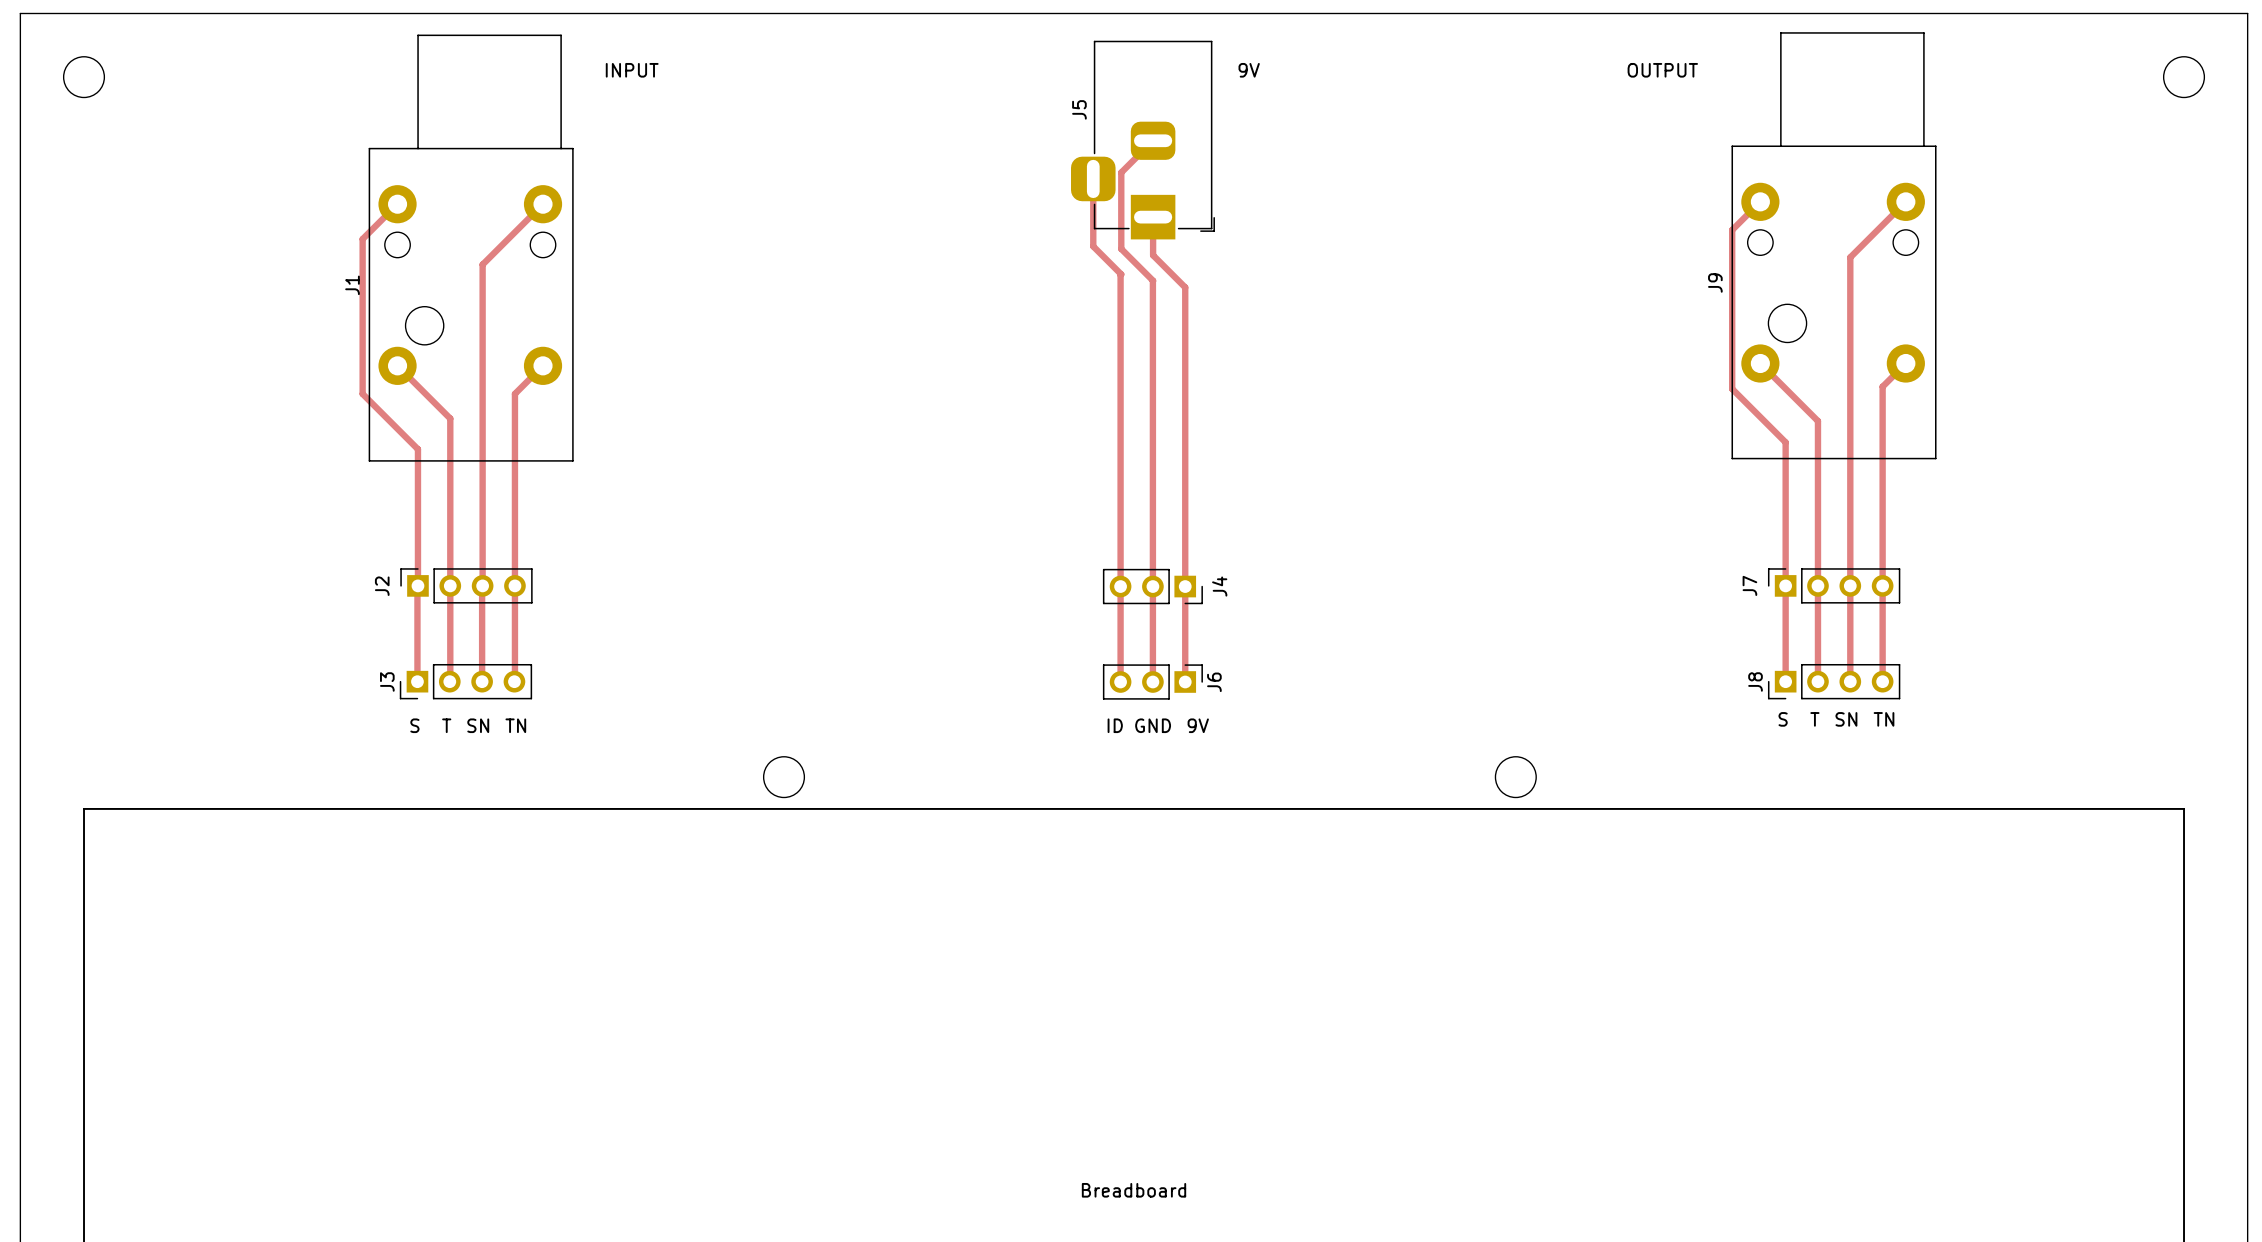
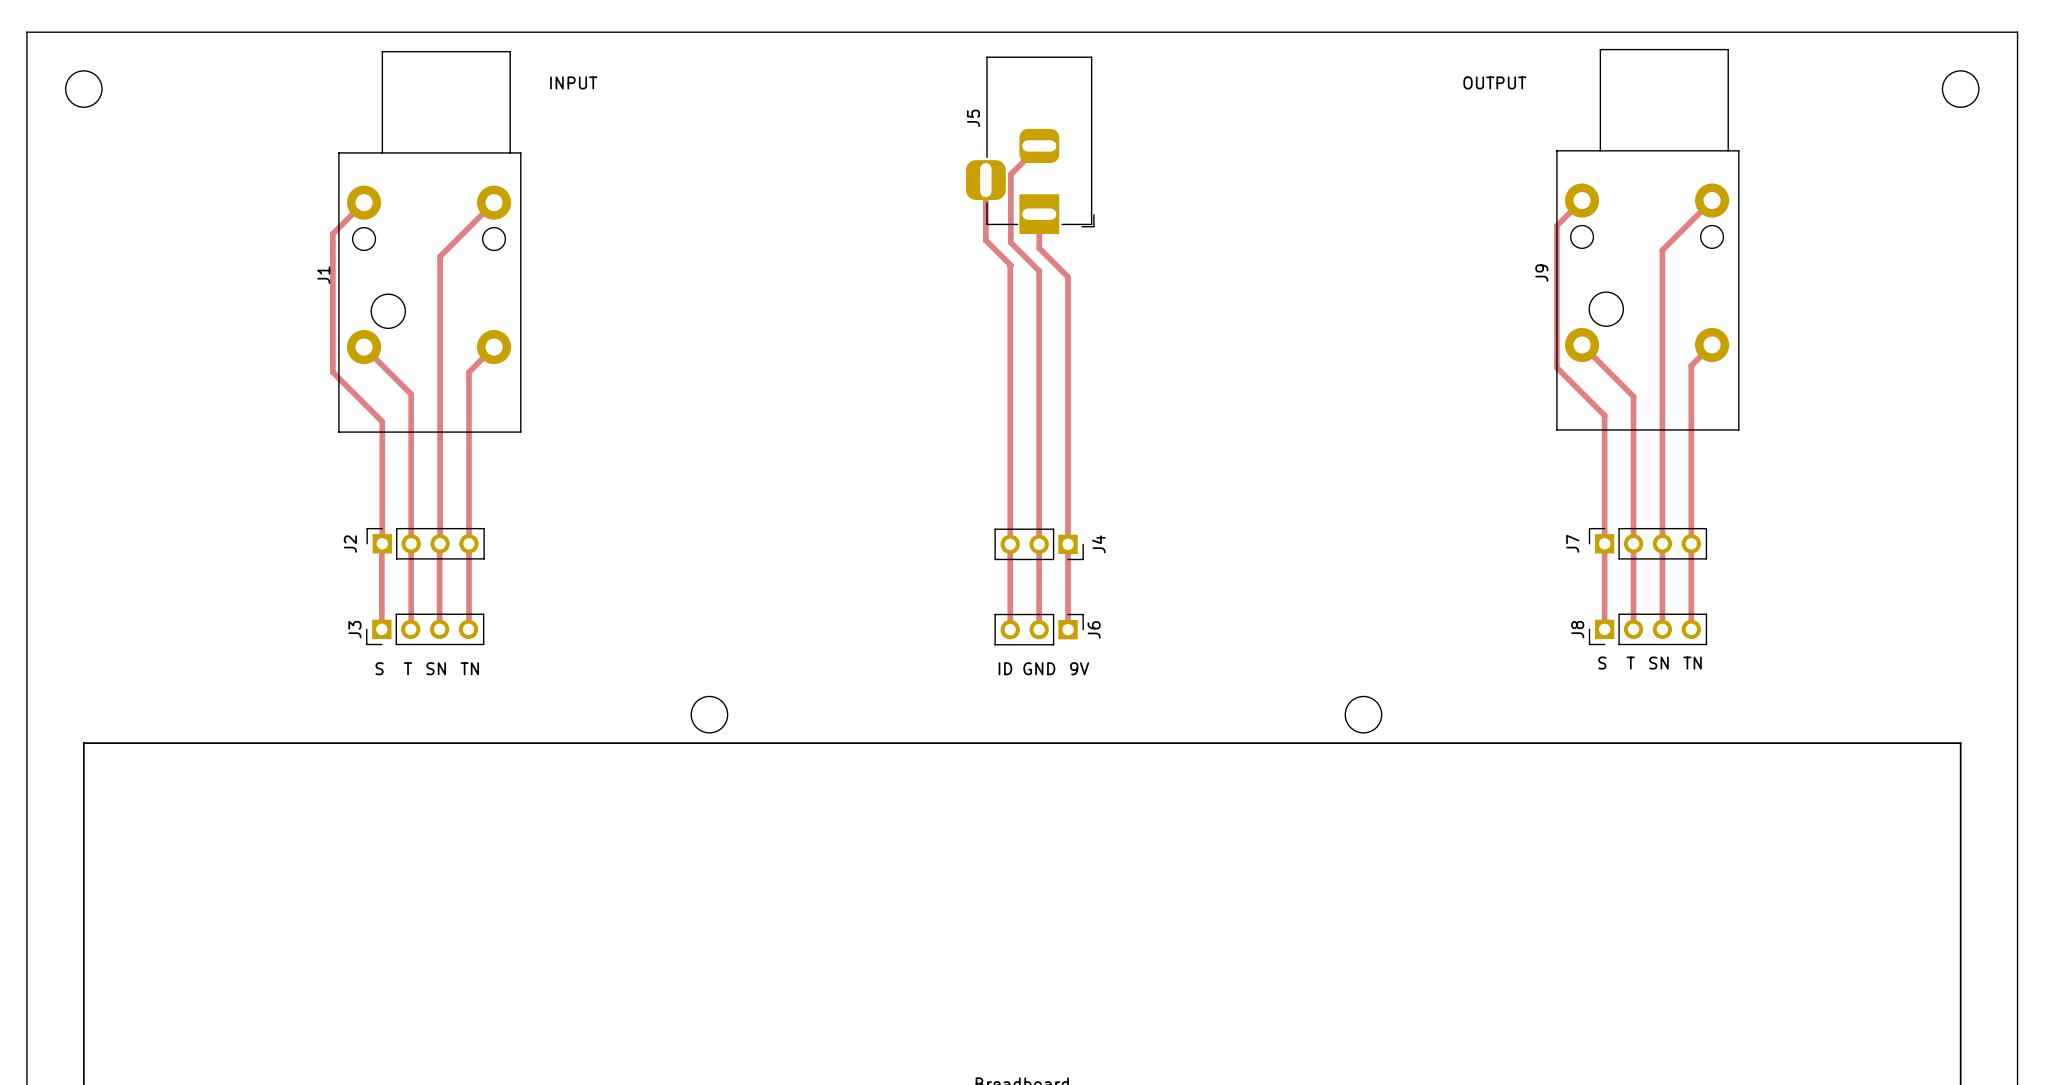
text: 9V (1249, 70) -> none

